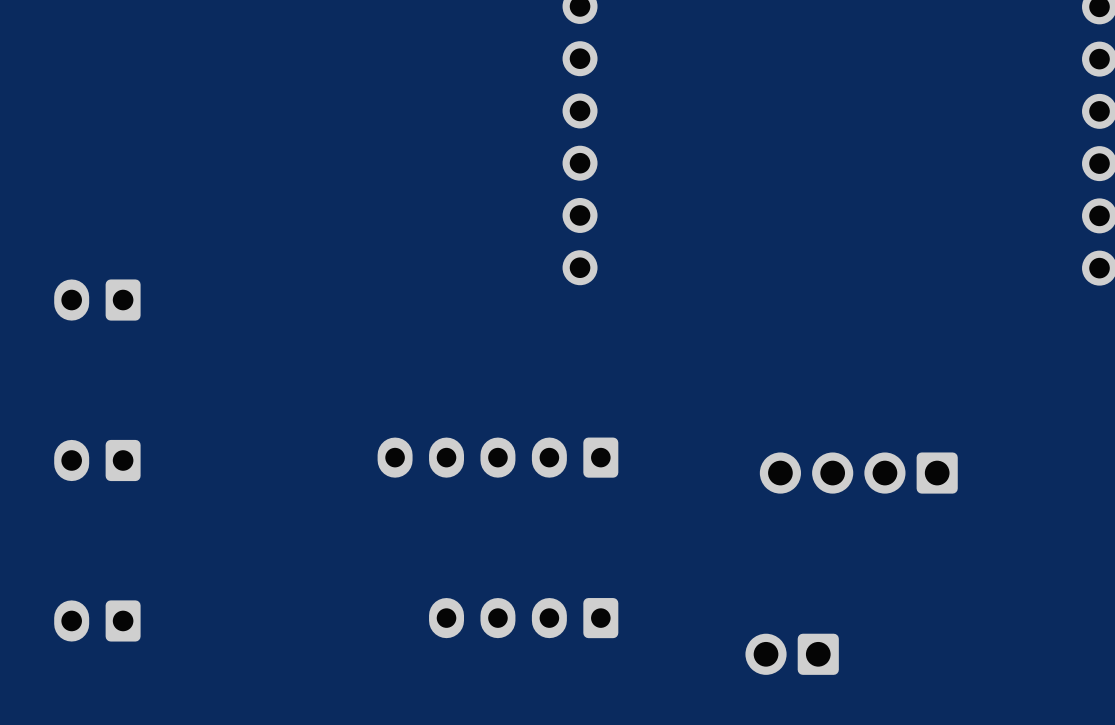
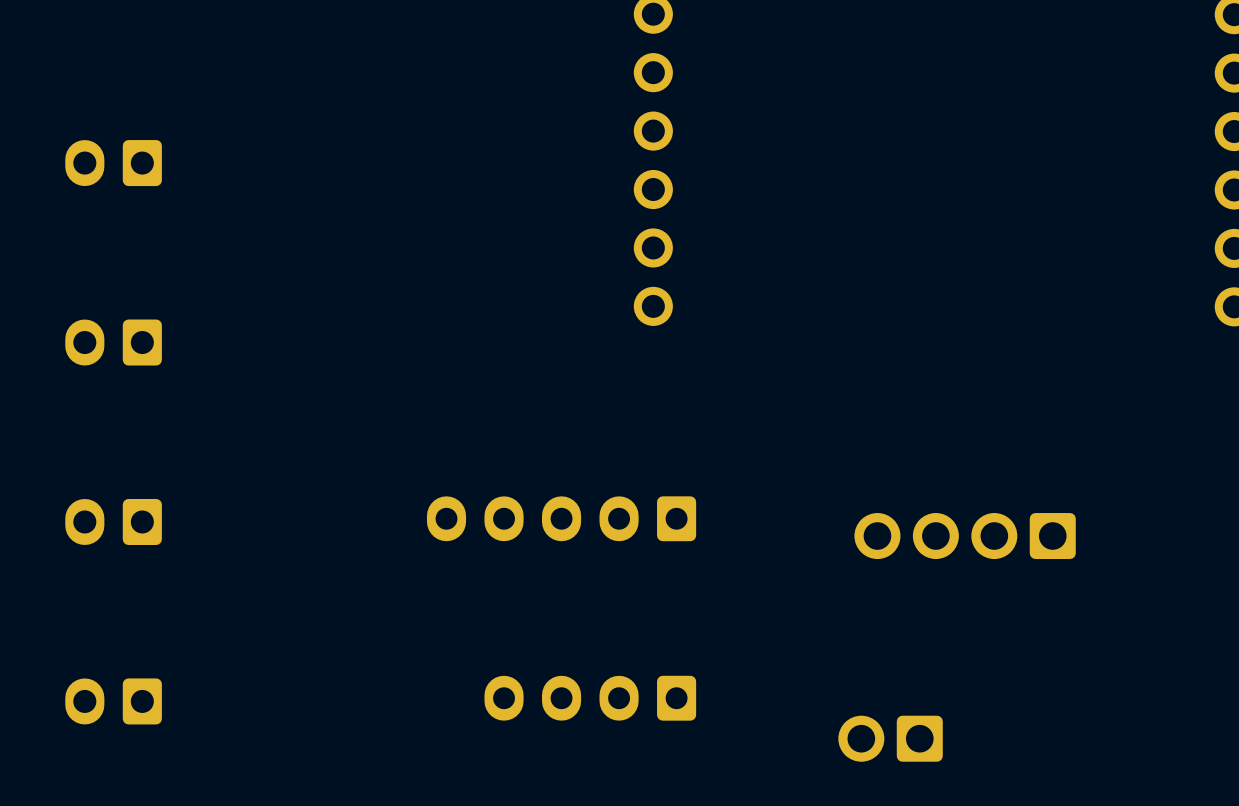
part: none -> (113, 163)

